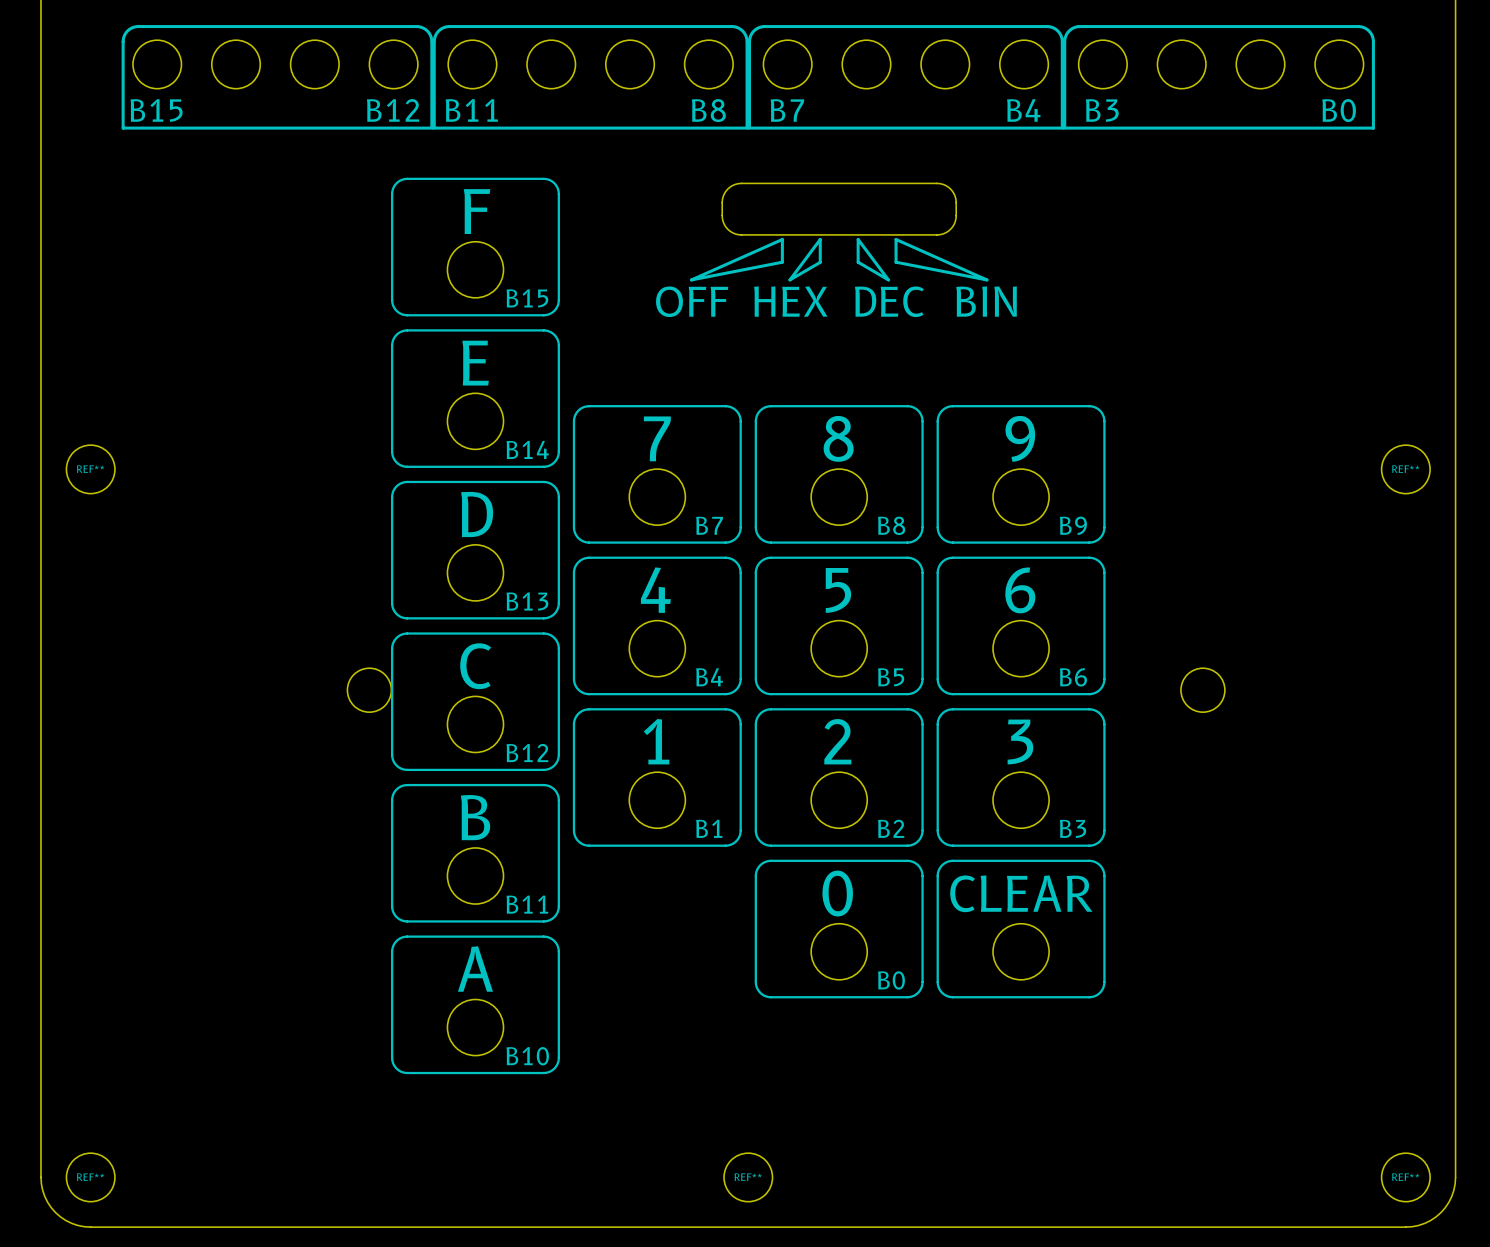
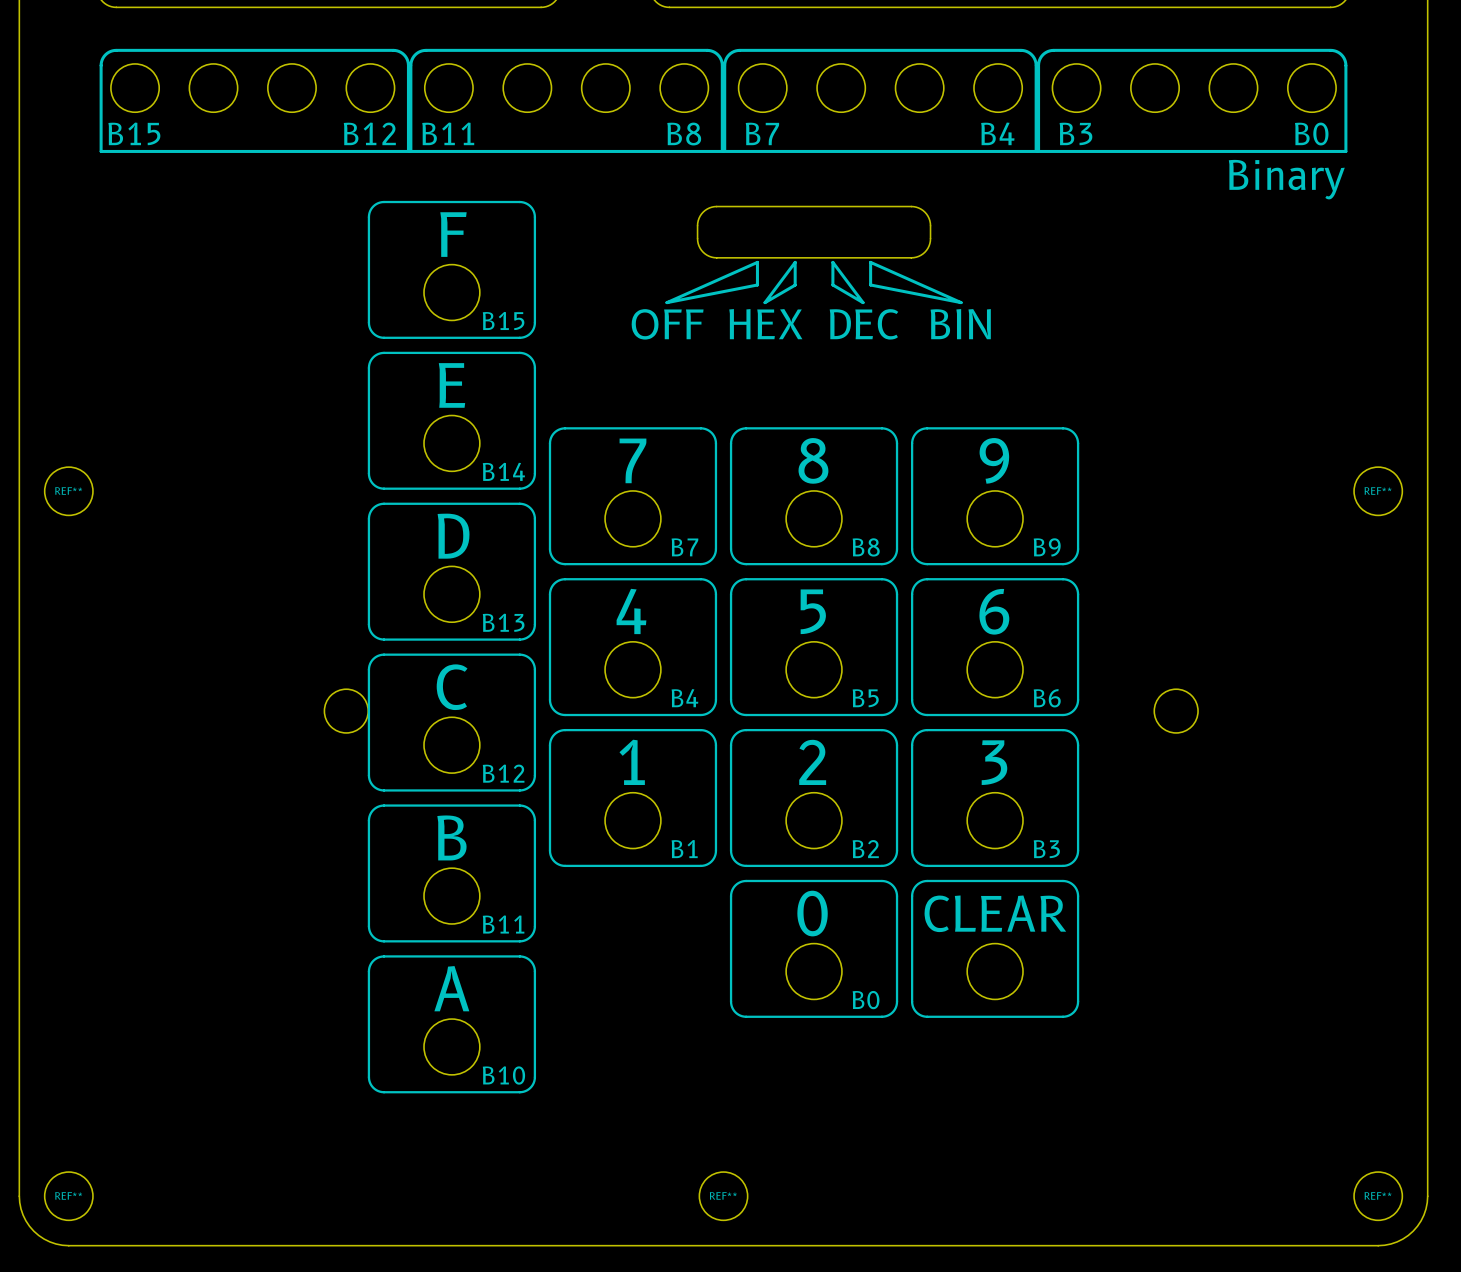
text: none -> Binary (1286, 179)

